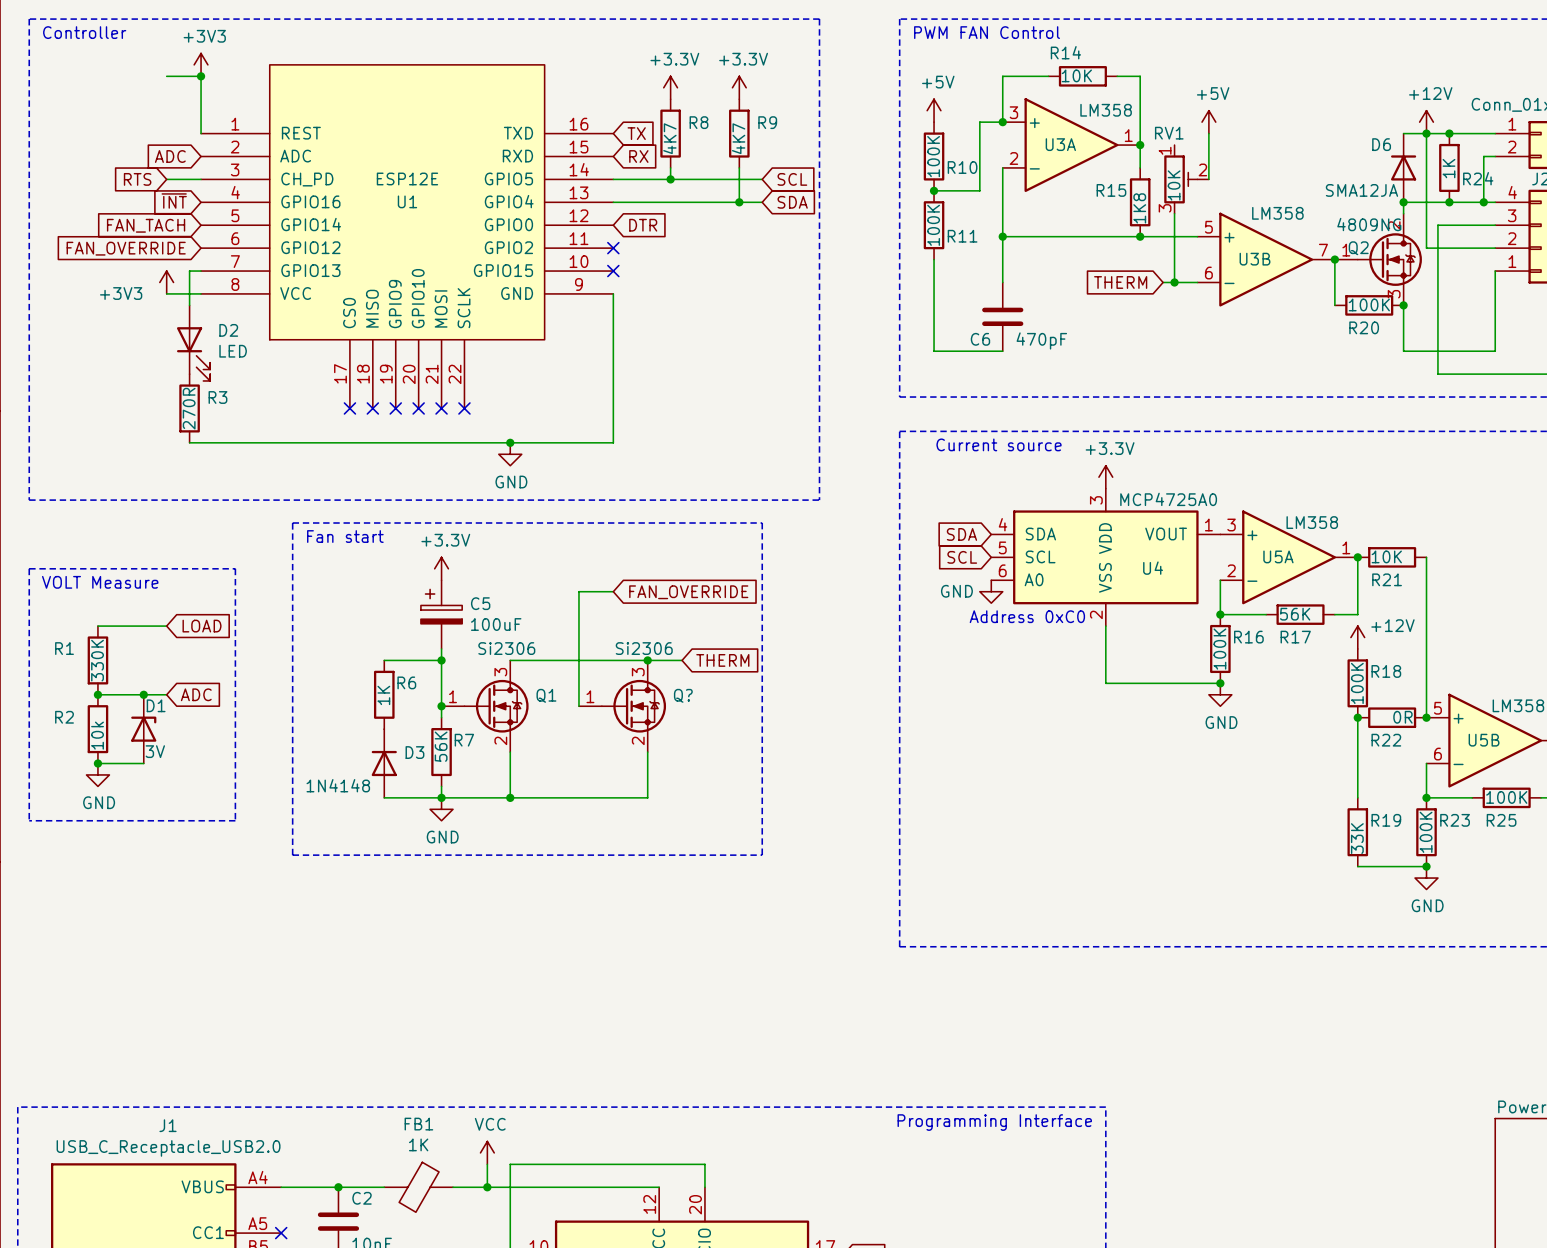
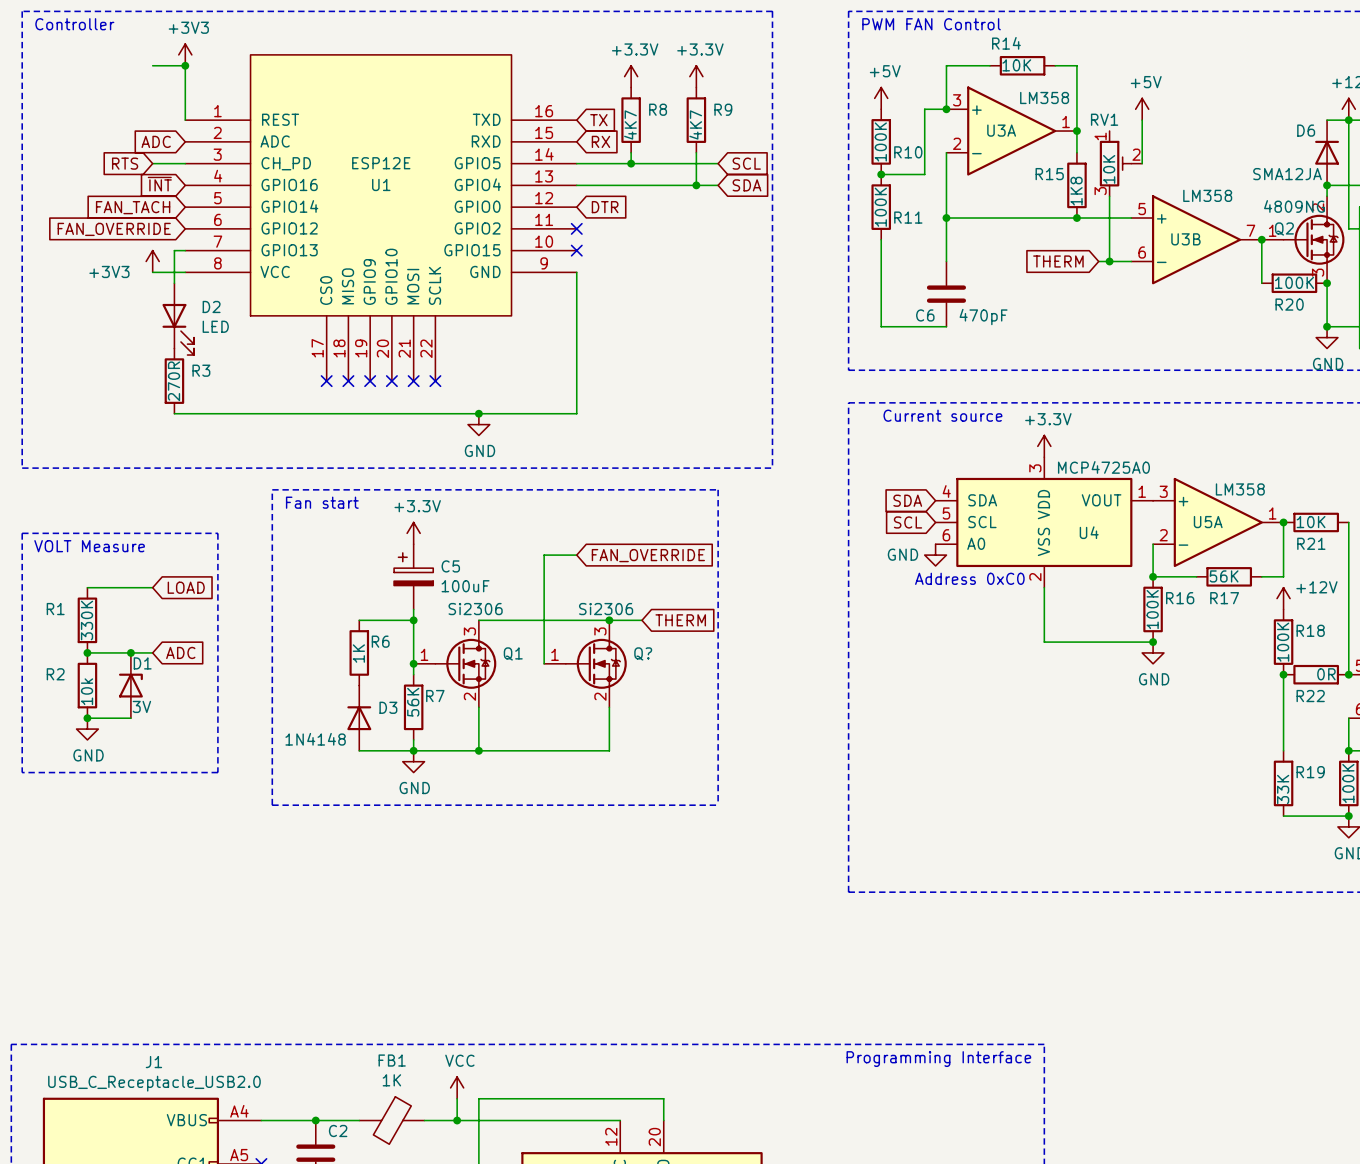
junction: none -> (1327, 326)
power symbol: none -> GND (1327, 337)

